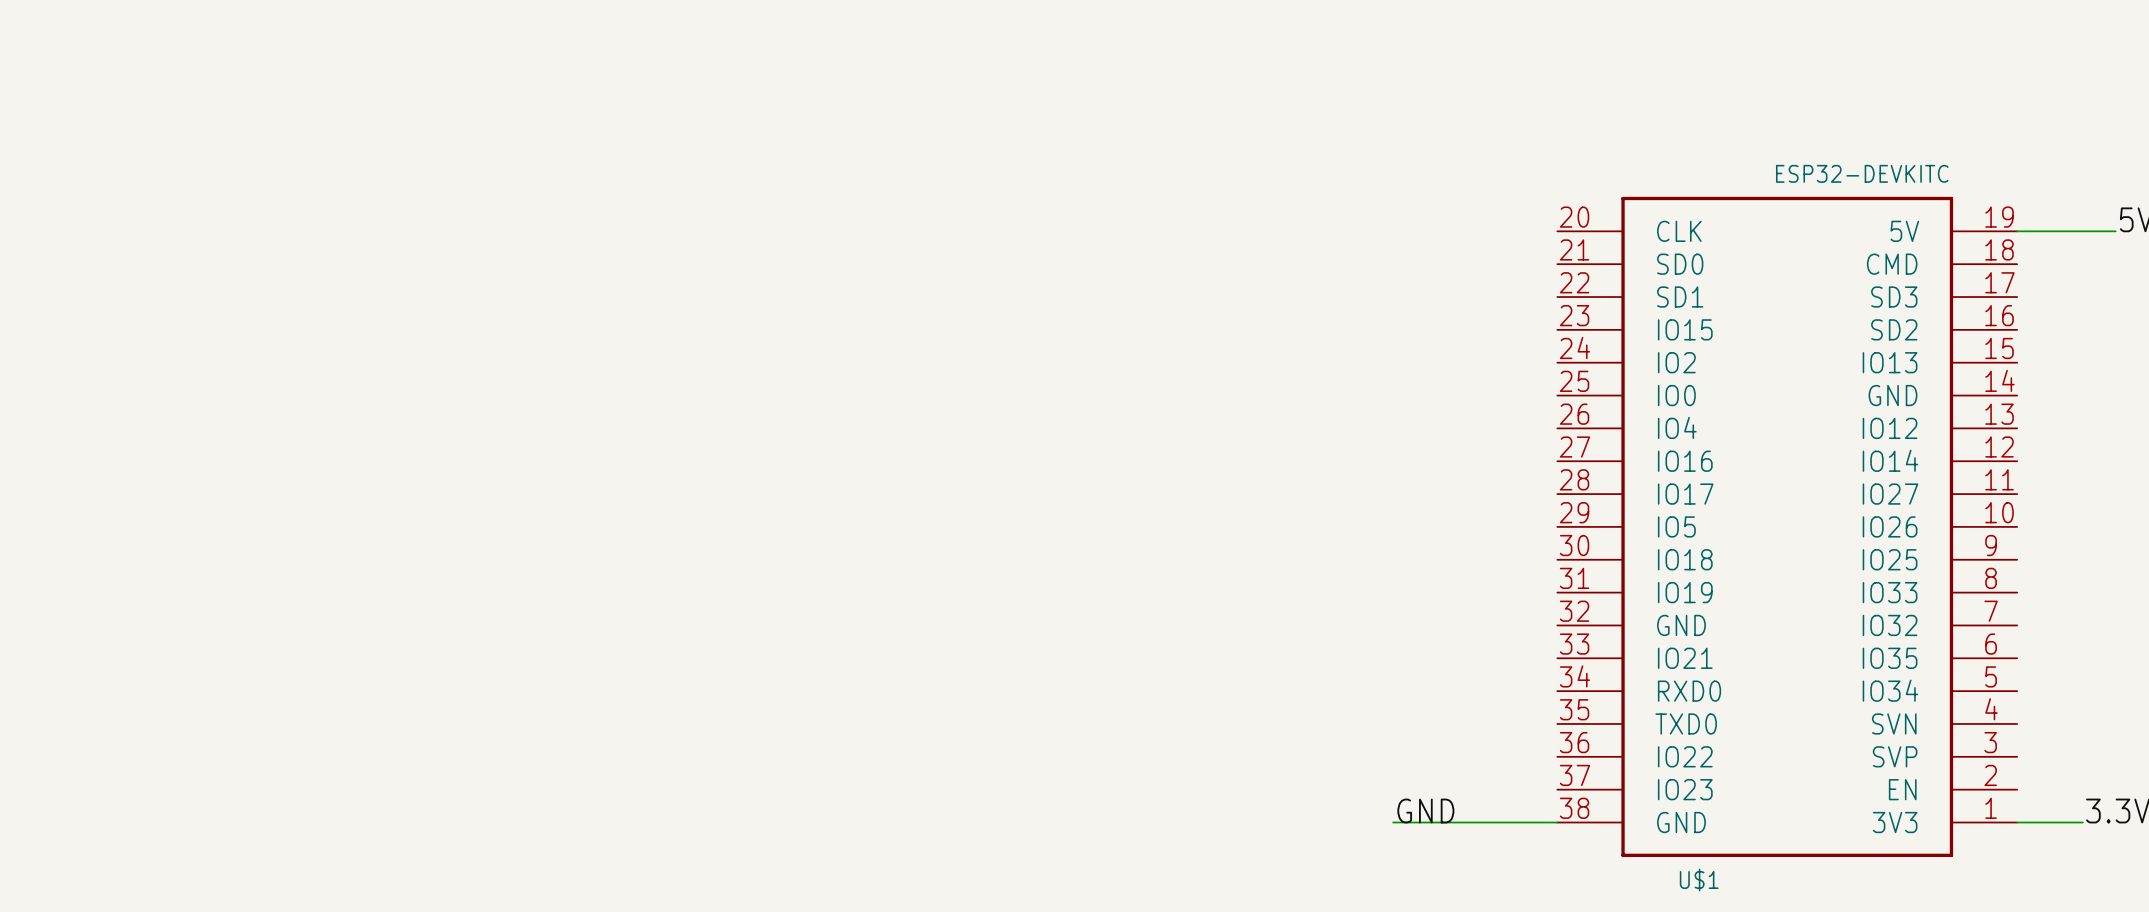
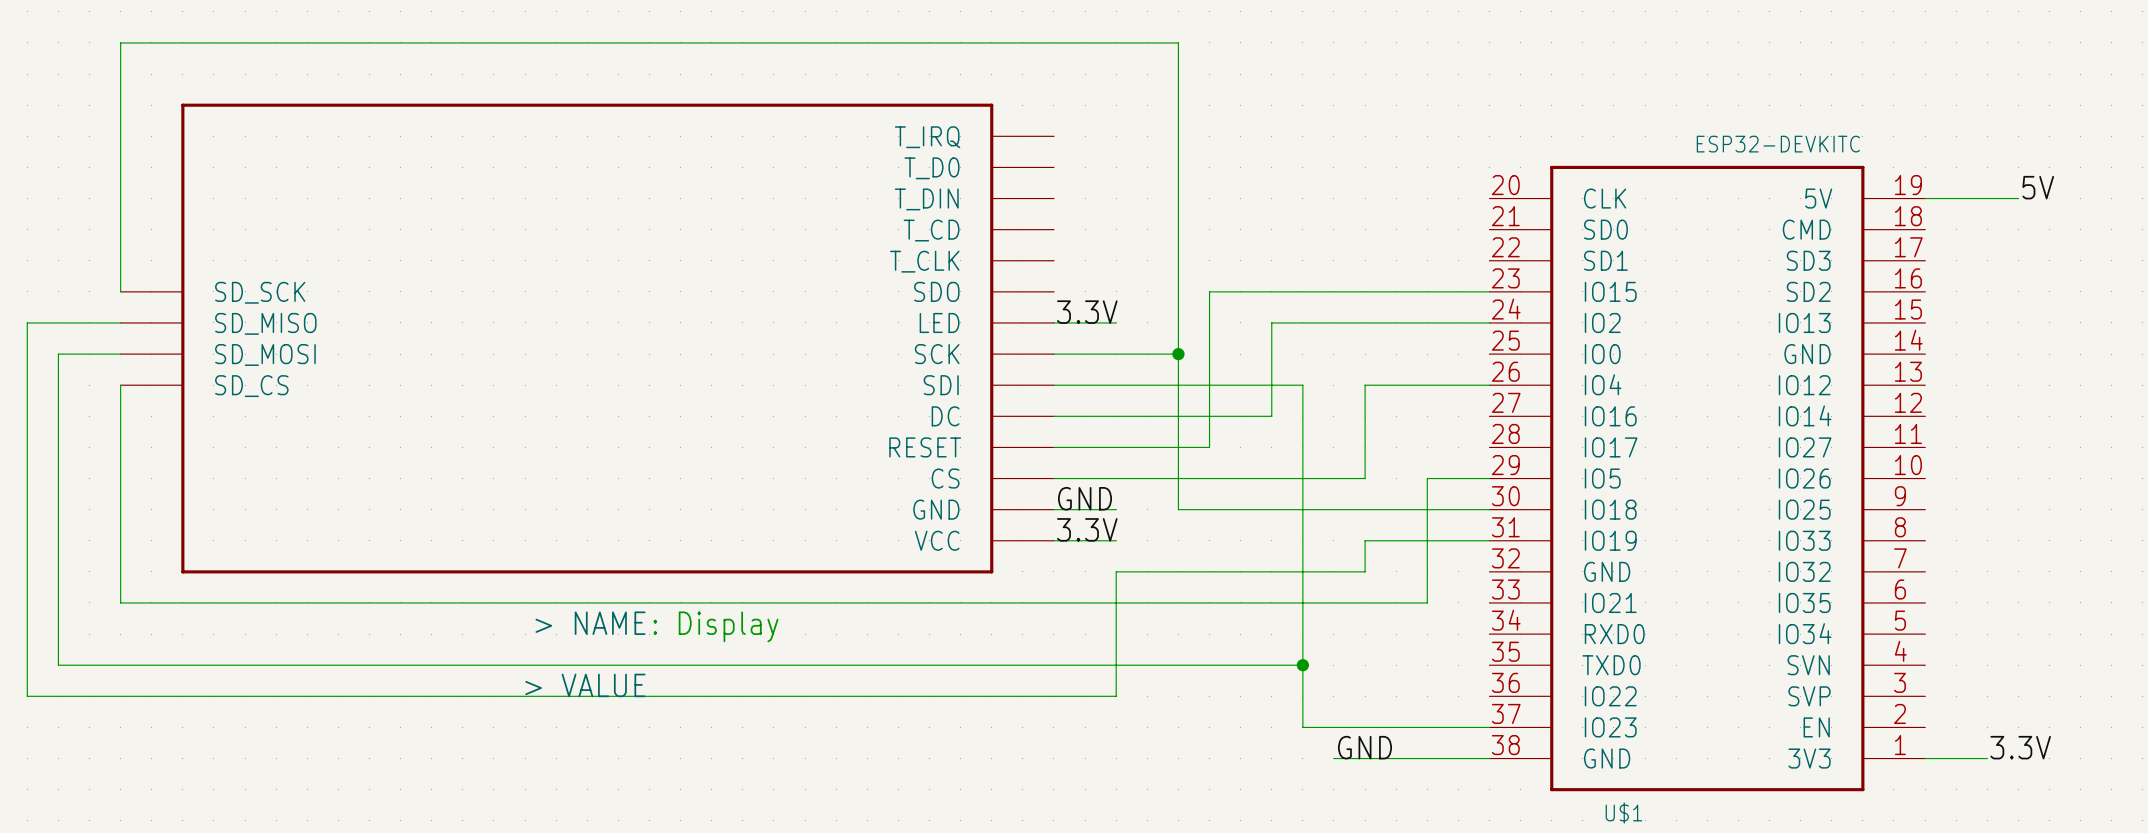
wire: none -> (120, 291) (120, 42) (1178, 42) (1178, 509) (1489, 509)
wire: none -> (1489, 291) (1209, 291) (1209, 447) (1053, 447)
label: none -> 3.3V (1087, 312)
wire: none -> (120, 322) (27, 322) (27, 696) (1116, 696) (1116, 571) (1365, 571) (1365, 540) (1489, 540)
wire: none -> (1053, 322) (1116, 322)
wire: none -> (1489, 322) (1271, 322) (1271, 416) (1053, 416)
part: none -> (587, 338)
wire: none -> (120, 354) (58, 354) (58, 665) (1302, 665)
wire: none -> (1053, 354) (1178, 354)
junction: none -> (1178, 354)
wire: none -> (120, 385) (120, 602) (1427, 602) (1427, 478) (1489, 478)
wire: none -> (1053, 385) (1302, 385) (1302, 727) (1489, 727)
wire: none -> (1489, 385) (1365, 385) (1365, 478) (1053, 478)
label: none -> GND (1084, 498)
wire: none -> (1053, 509) (1116, 509)
label: none -> 3.3V (1087, 529)
wire: none -> (1053, 540) (1116, 540)
text: none -> : Display (716, 626)
junction: none -> (1302, 665)

